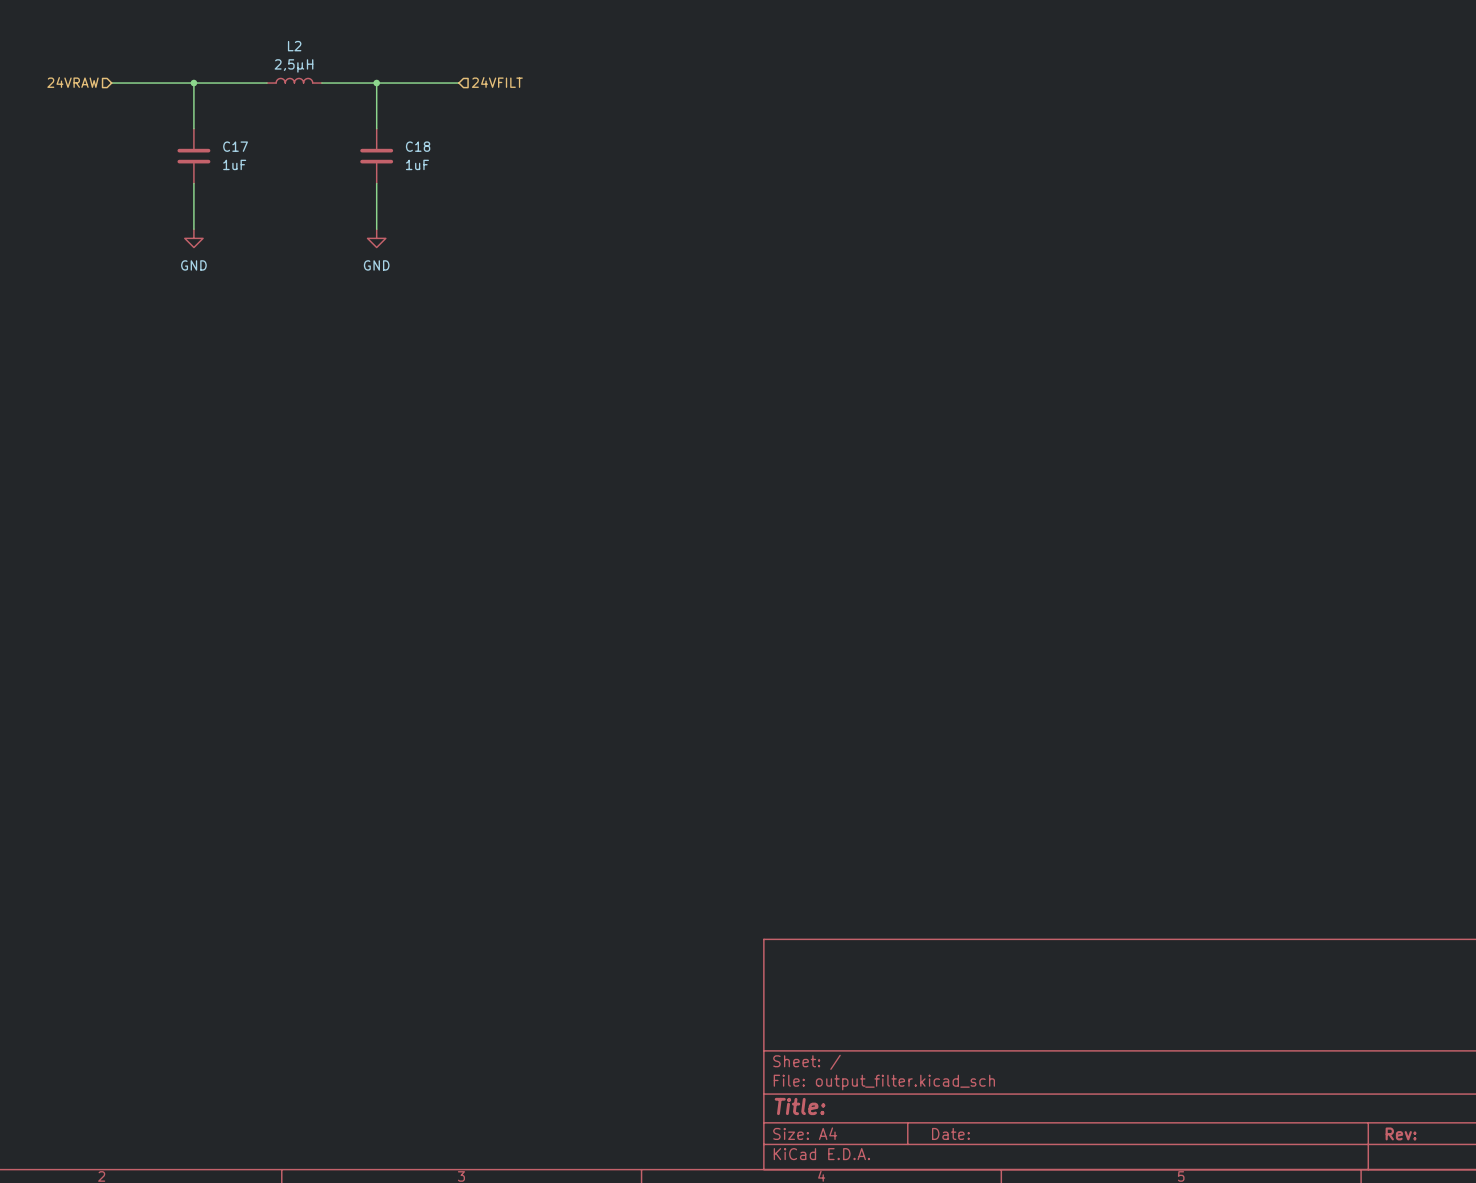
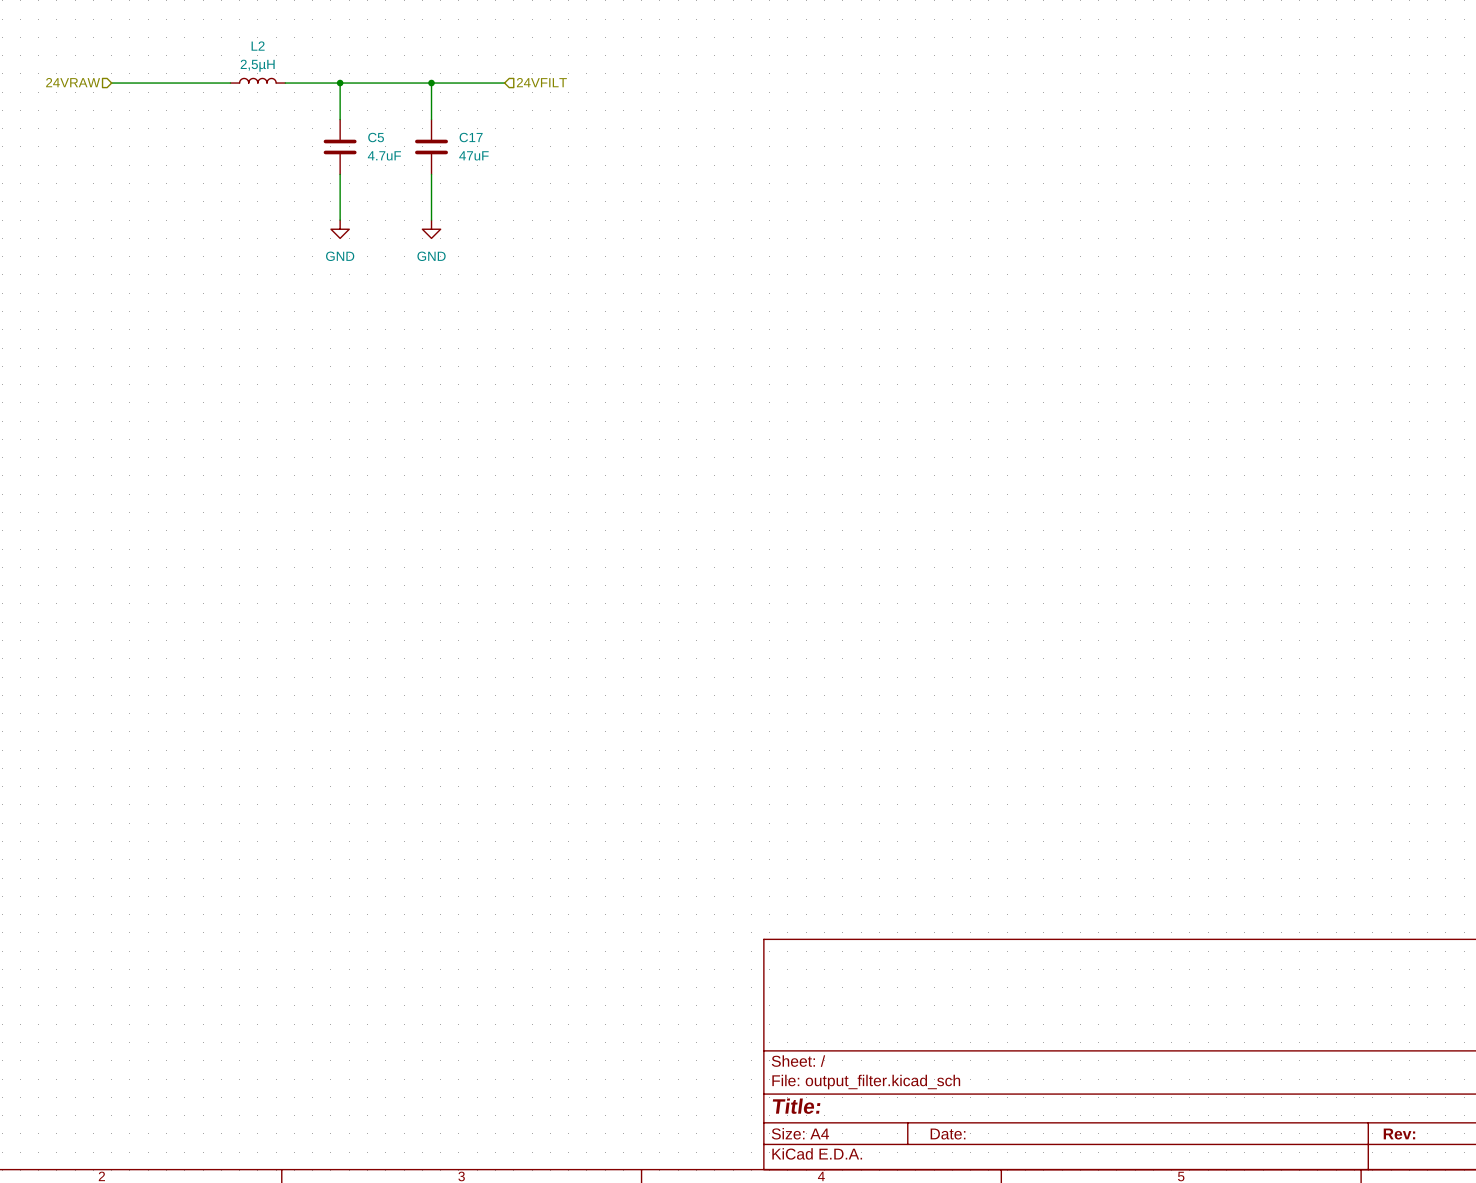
L2 position: (294, 80) -> (257, 80)
hierarchical label position: 24VFILT (497, 82) -> 24VFILT (541, 82)
wire: (193, 83) (193, 128) -> none
junction: (193, 83) -> none
wire: (230, 83) (267, 83) -> (285, 83) (321, 83)
wire: none -> (340, 83) (340, 119)
junction: none -> (340, 83)
wire: (376, 83) (376, 128) -> (431, 174) (431, 220)
junction: (376, 83) -> none
wire: none -> (431, 83) (431, 119)
junction: none -> (431, 83)
wire: none -> (458, 83) (504, 83)
C5: none -> 4.7uF (340, 146)
C17 position: (193, 156) -> (431, 146)
C18: 1uF (376, 156) -> none
C17 value: 1uF (234, 164) -> 47uF (473, 155)
wire: (193, 183) (193, 229) -> none
wire: (376, 183) (376, 229) -> (340, 174) (340, 220)
power symbol: none -> GND (340, 229)
power symbol: none -> GND (431, 229)
power symbol: GND (193, 238) -> none
power symbol: GND (376, 238) -> none

